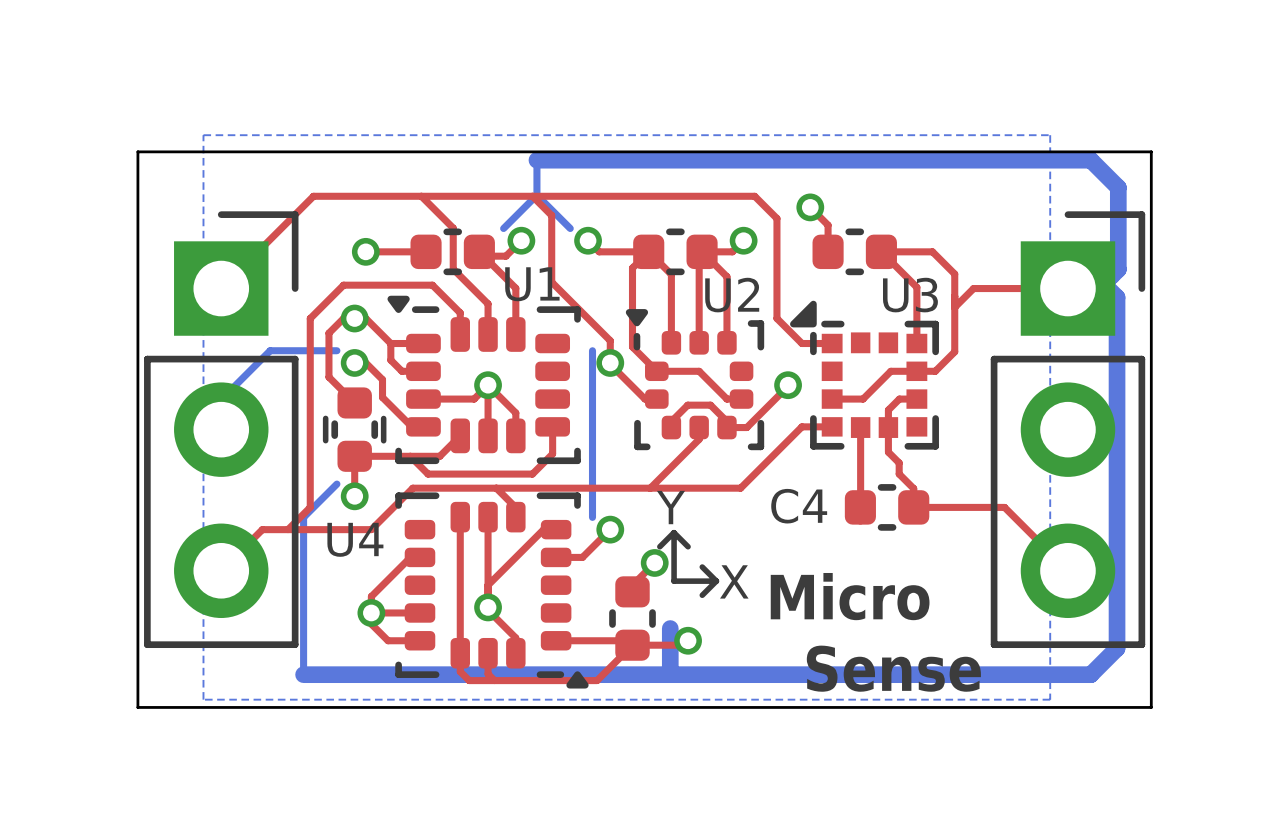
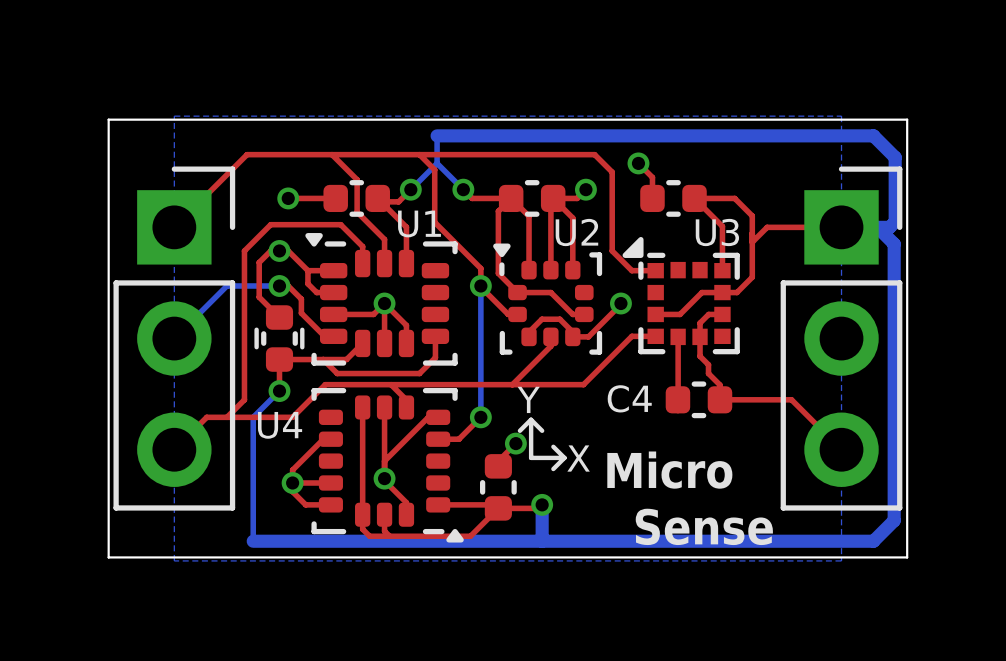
bottom zone outline: (203, 135) (1050, 135) (1050, 699) (203, 699) (203, 135) -> (174, 116) (841, 116) (841, 560) (174, 560) (174, 116)
bottom track: (536, 195) (536, 160) (1090, 160) (1118, 187) (1118, 269) (1111, 276) (1095, 276) (1117, 297) (1117, 648) (1090, 674) (303, 674) (303, 517) (336, 484) -> (437, 163) (437, 135) (873, 135) (895, 157) (895, 221) (889, 227) (877, 227) (894, 244) (894, 520) (873, 541) (253, 541) (253, 417) (279, 391)
bottom track: (536, 195) (570, 228) -> (437, 163) (463, 189)
bottom track: (536, 195) (503, 228) -> (437, 163) (410, 189)
bottom track: (336, 350) (270, 350) (203, 417) -> (279, 285) (226, 285) (174, 338)
bottom track: (592, 350) (592, 517) -> (480, 285) (480, 417)
bottom track: (670, 628) (670, 674) -> (542, 504) (542, 541)

